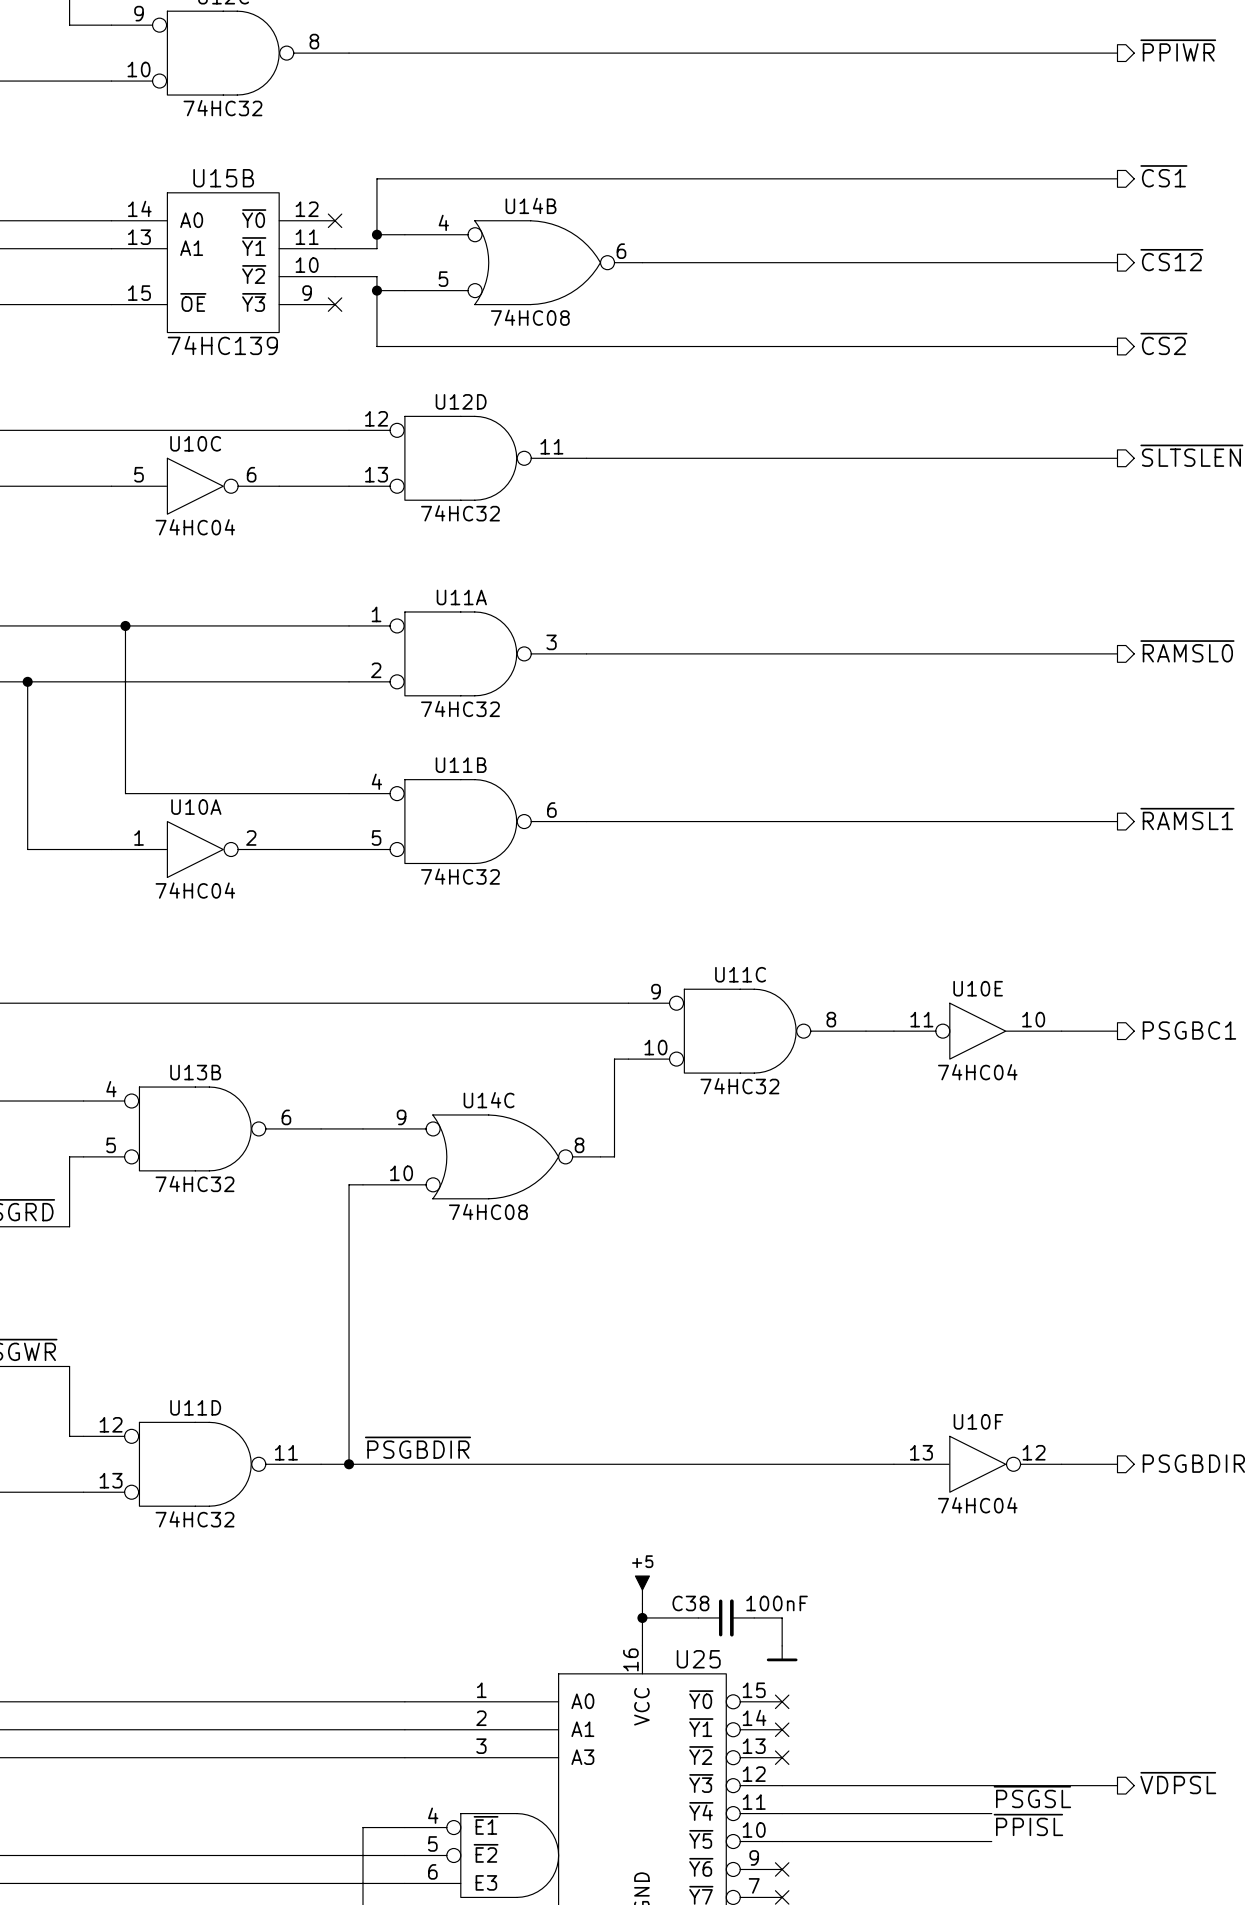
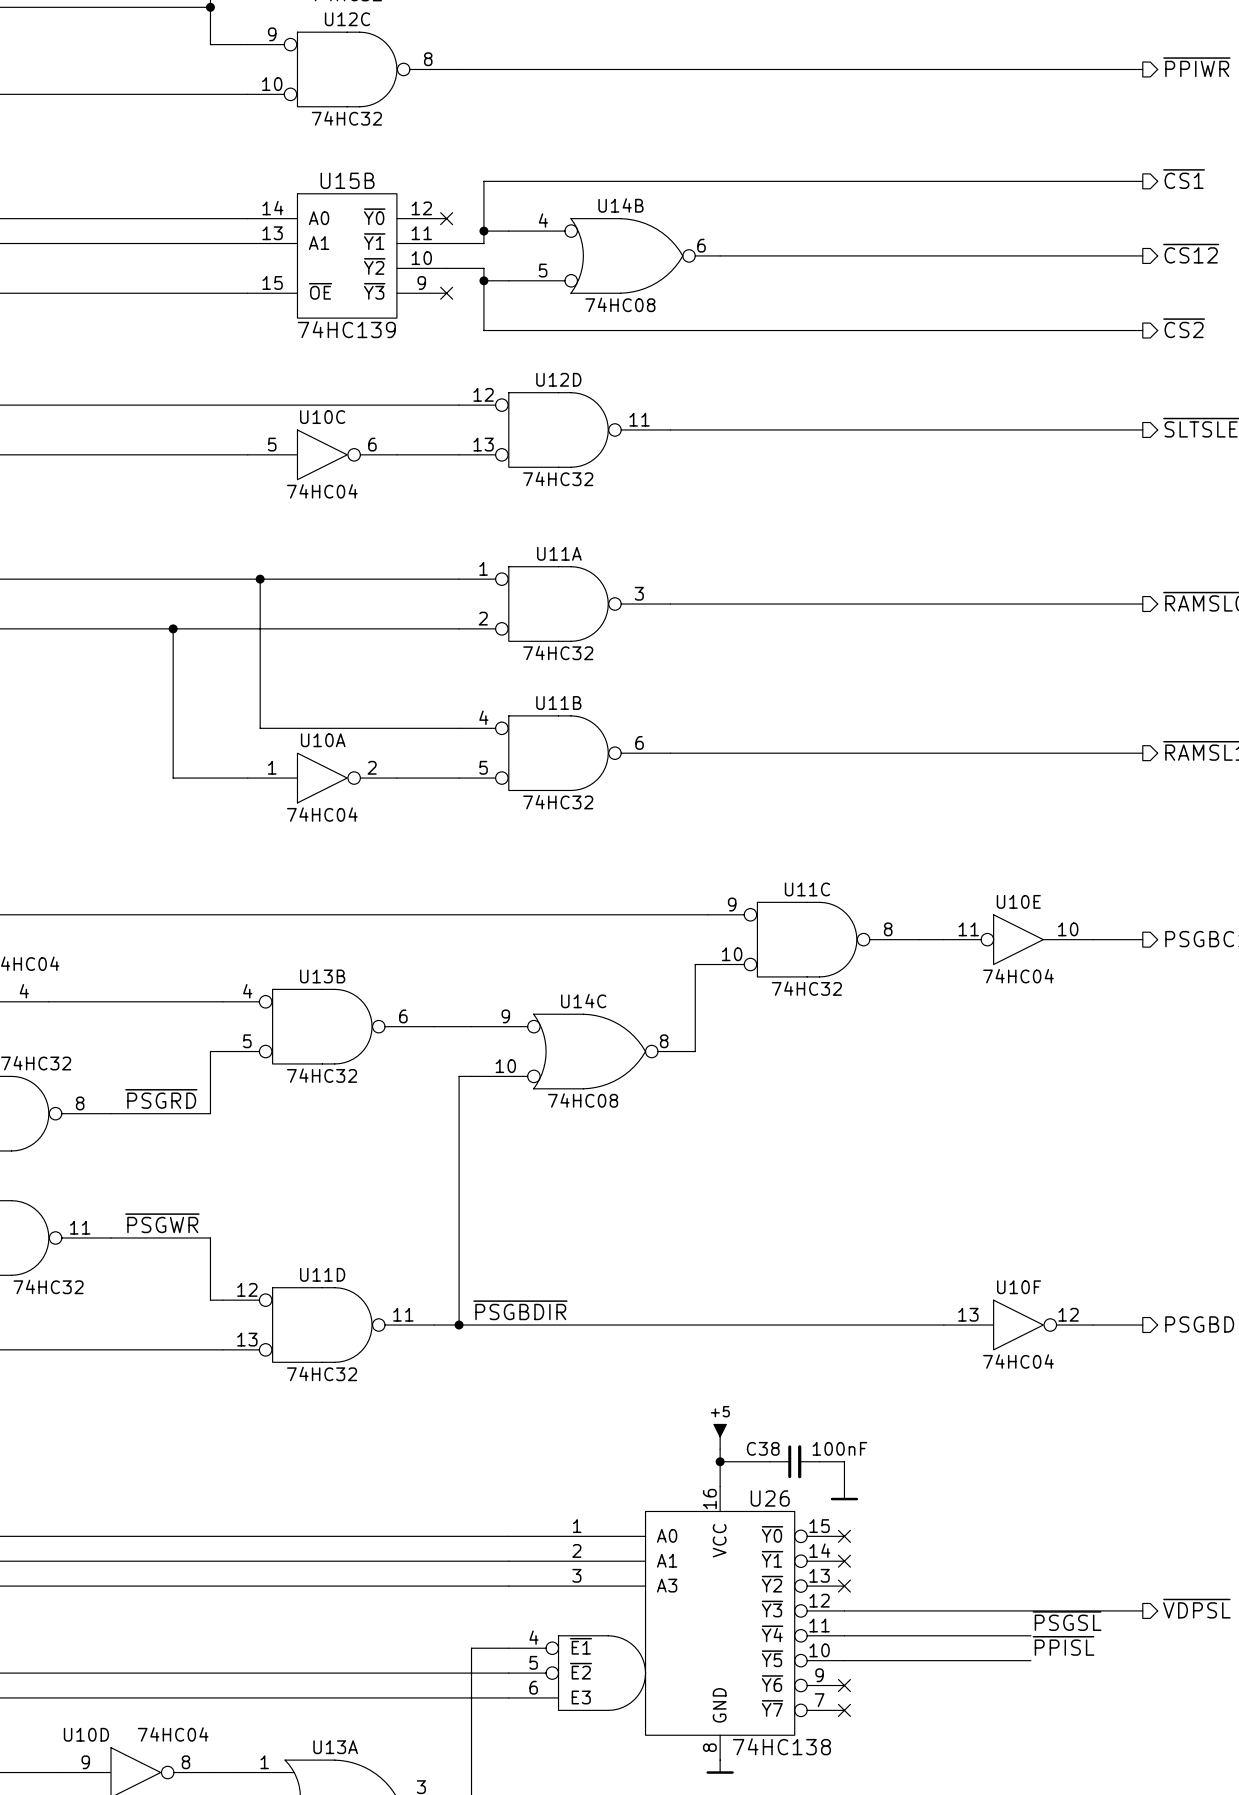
U25 name: U25 (698, 1659) -> U26 (770, 1498)

